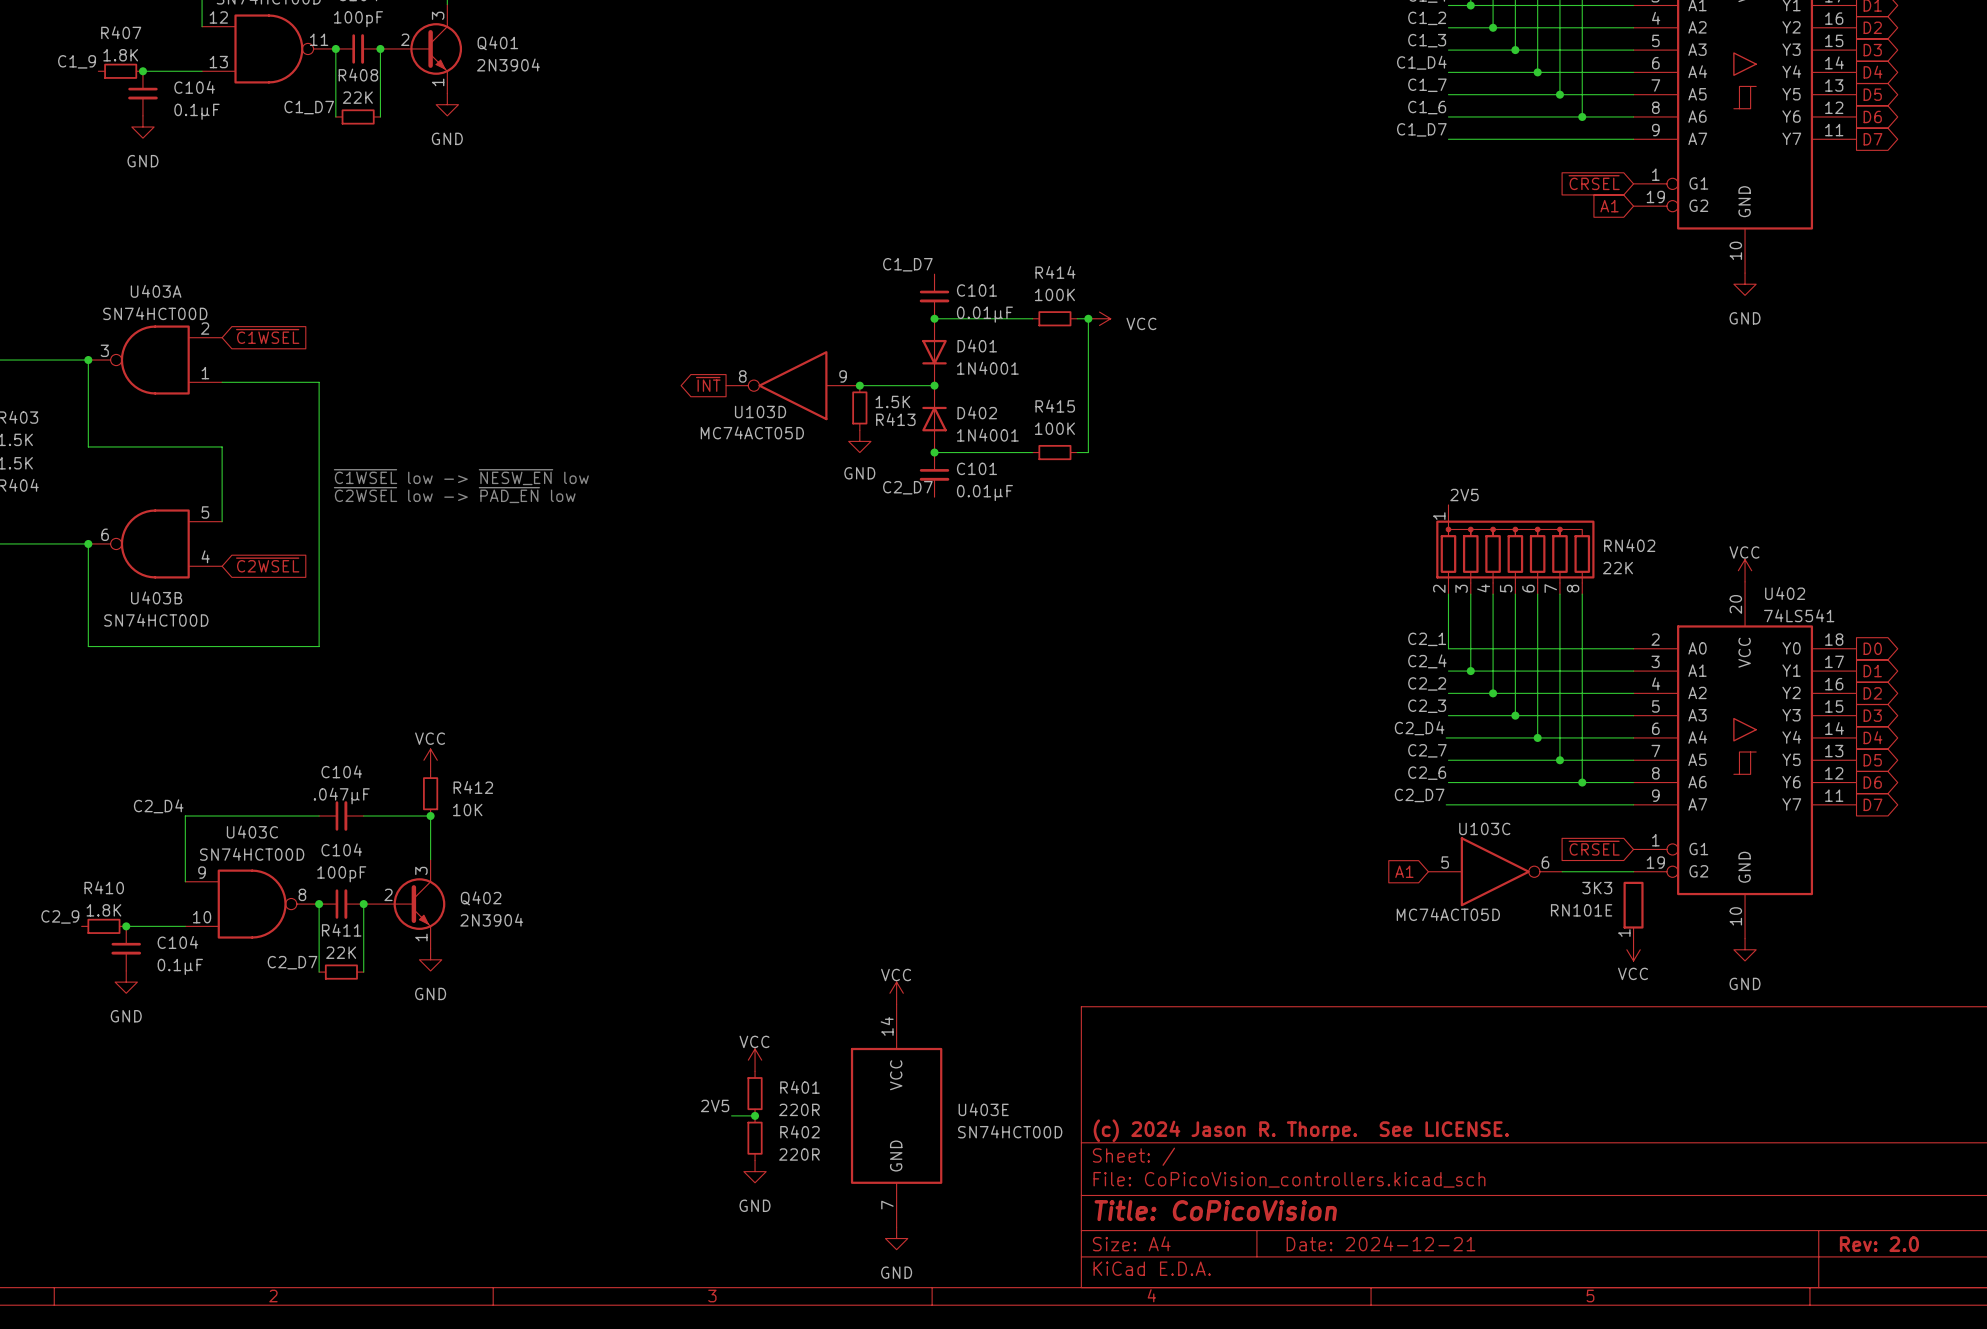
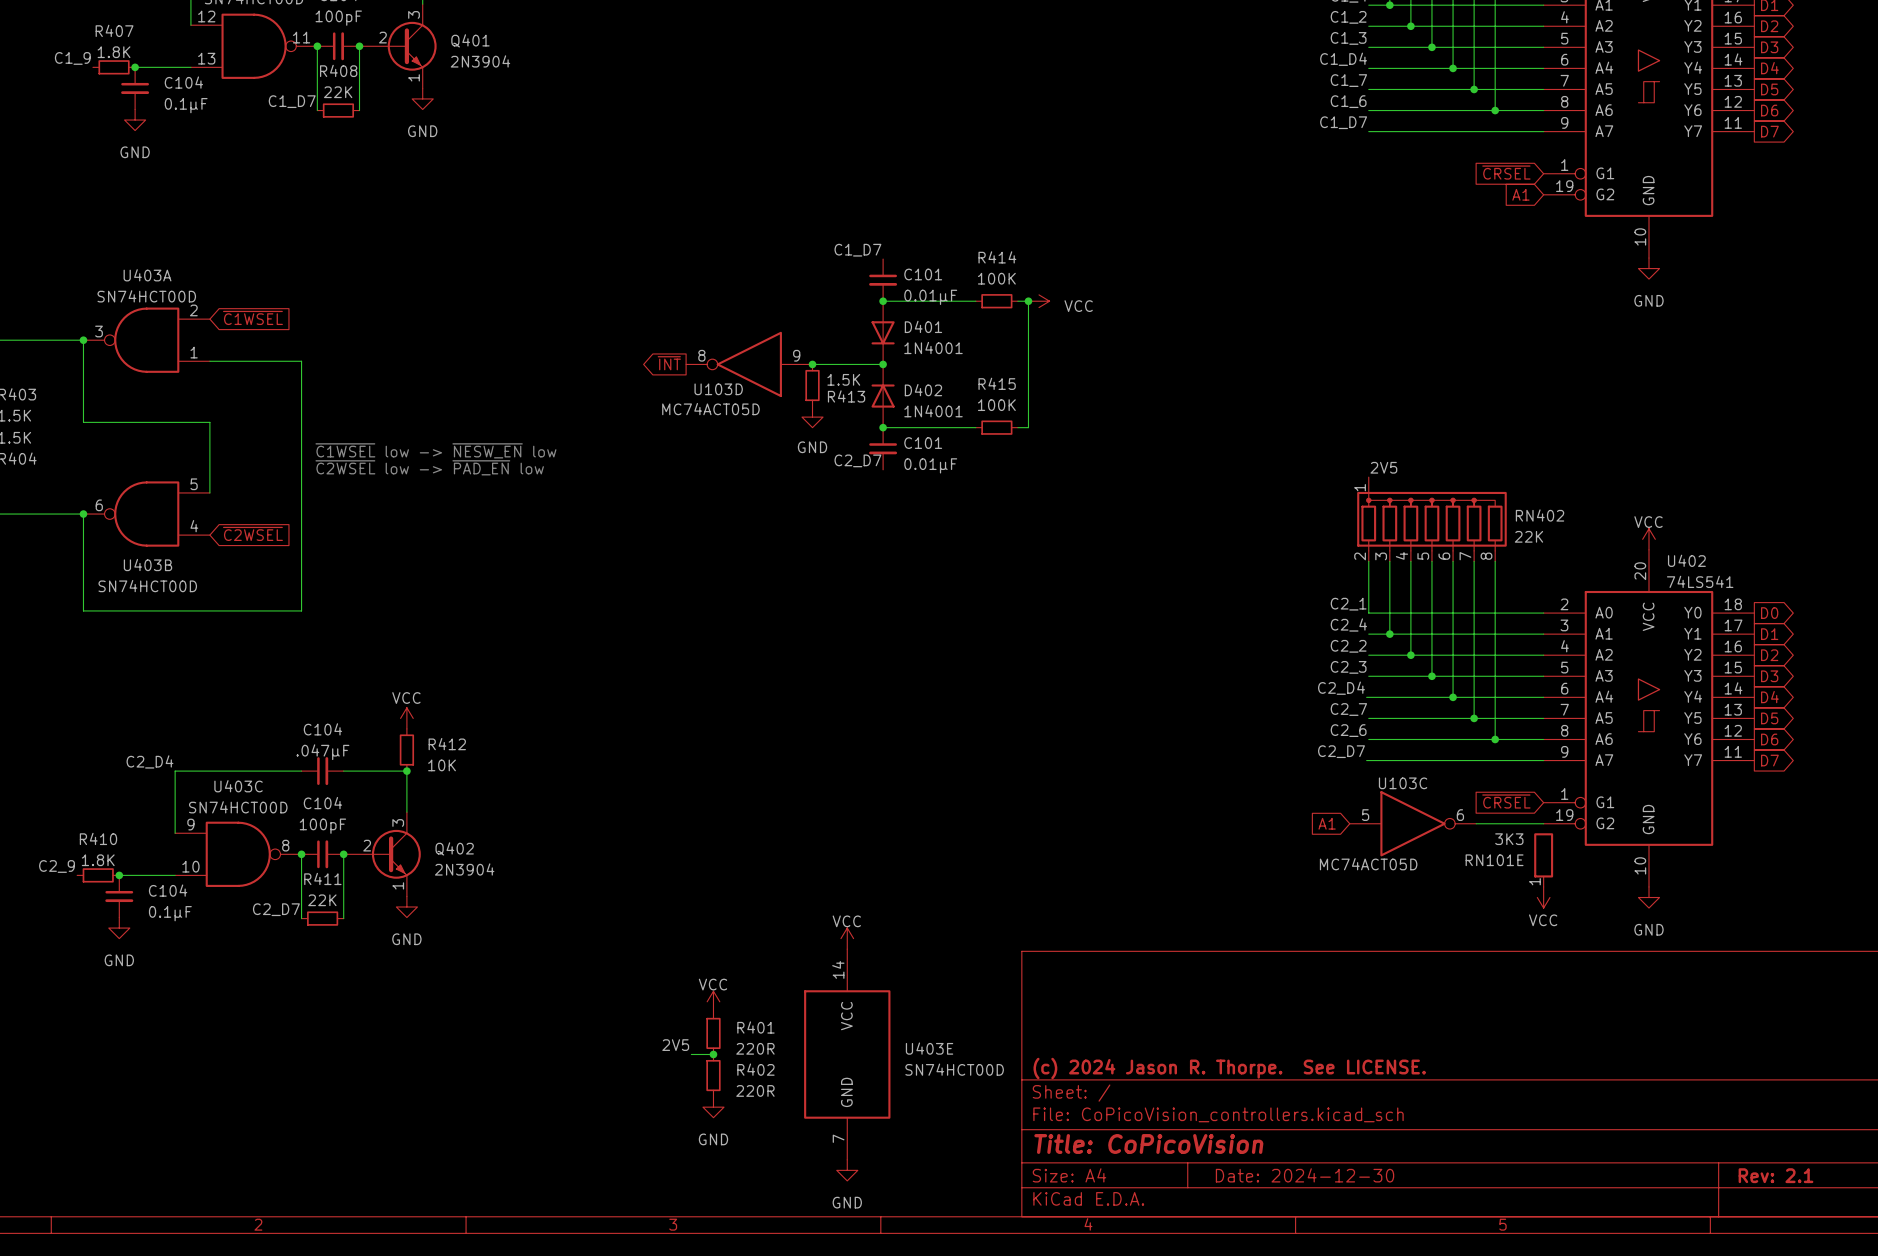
title block: Date: 2024-12-21 (1381, 1243) -> Date: 2024-12-30 (1305, 1175)
title block: Rev: 2.0 (1879, 1244) -> Rev: 2.1 (1775, 1175)

